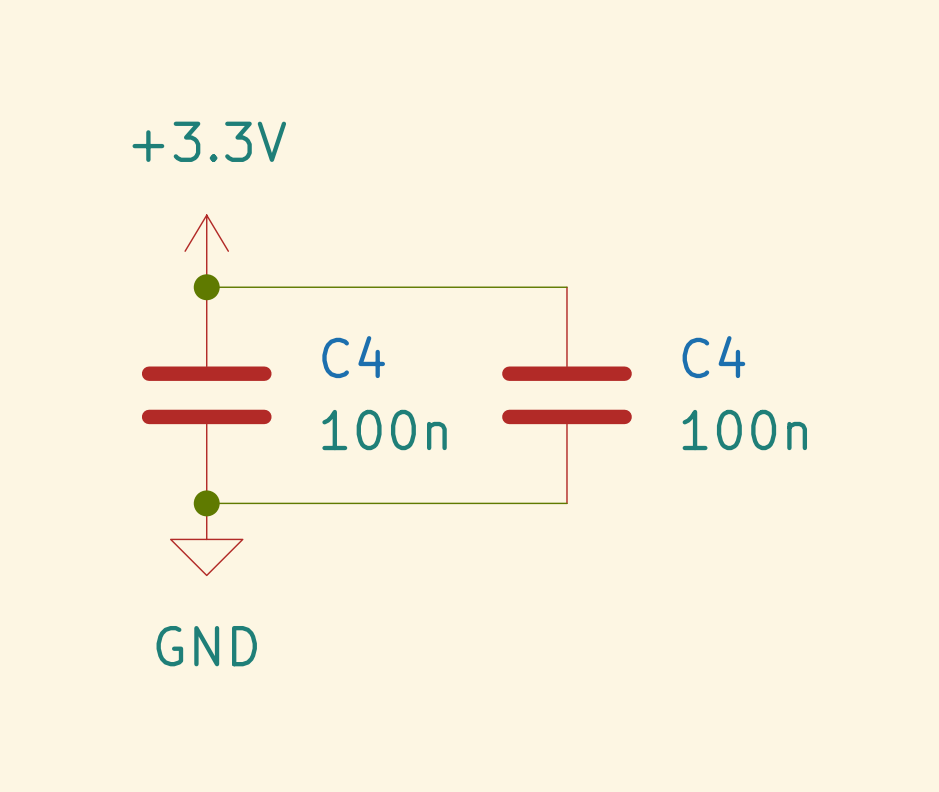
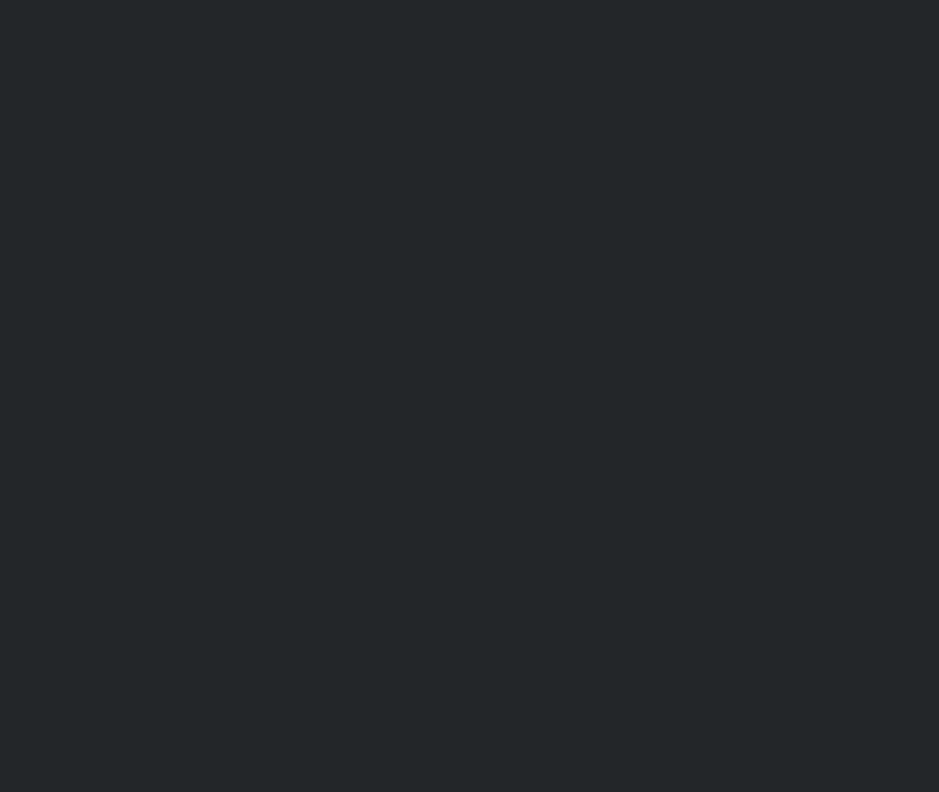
power symbol: +3.3V (206, 251) -> none
wire: (206, 287) (566, 287) -> none
junction: (206, 287) -> none
C4: 100n (206, 395) -> none
C4: 100n (566, 395) -> none
wire: (206, 503) (566, 503) -> none
junction: (206, 503) -> none
power symbol: GND (206, 539) -> none

